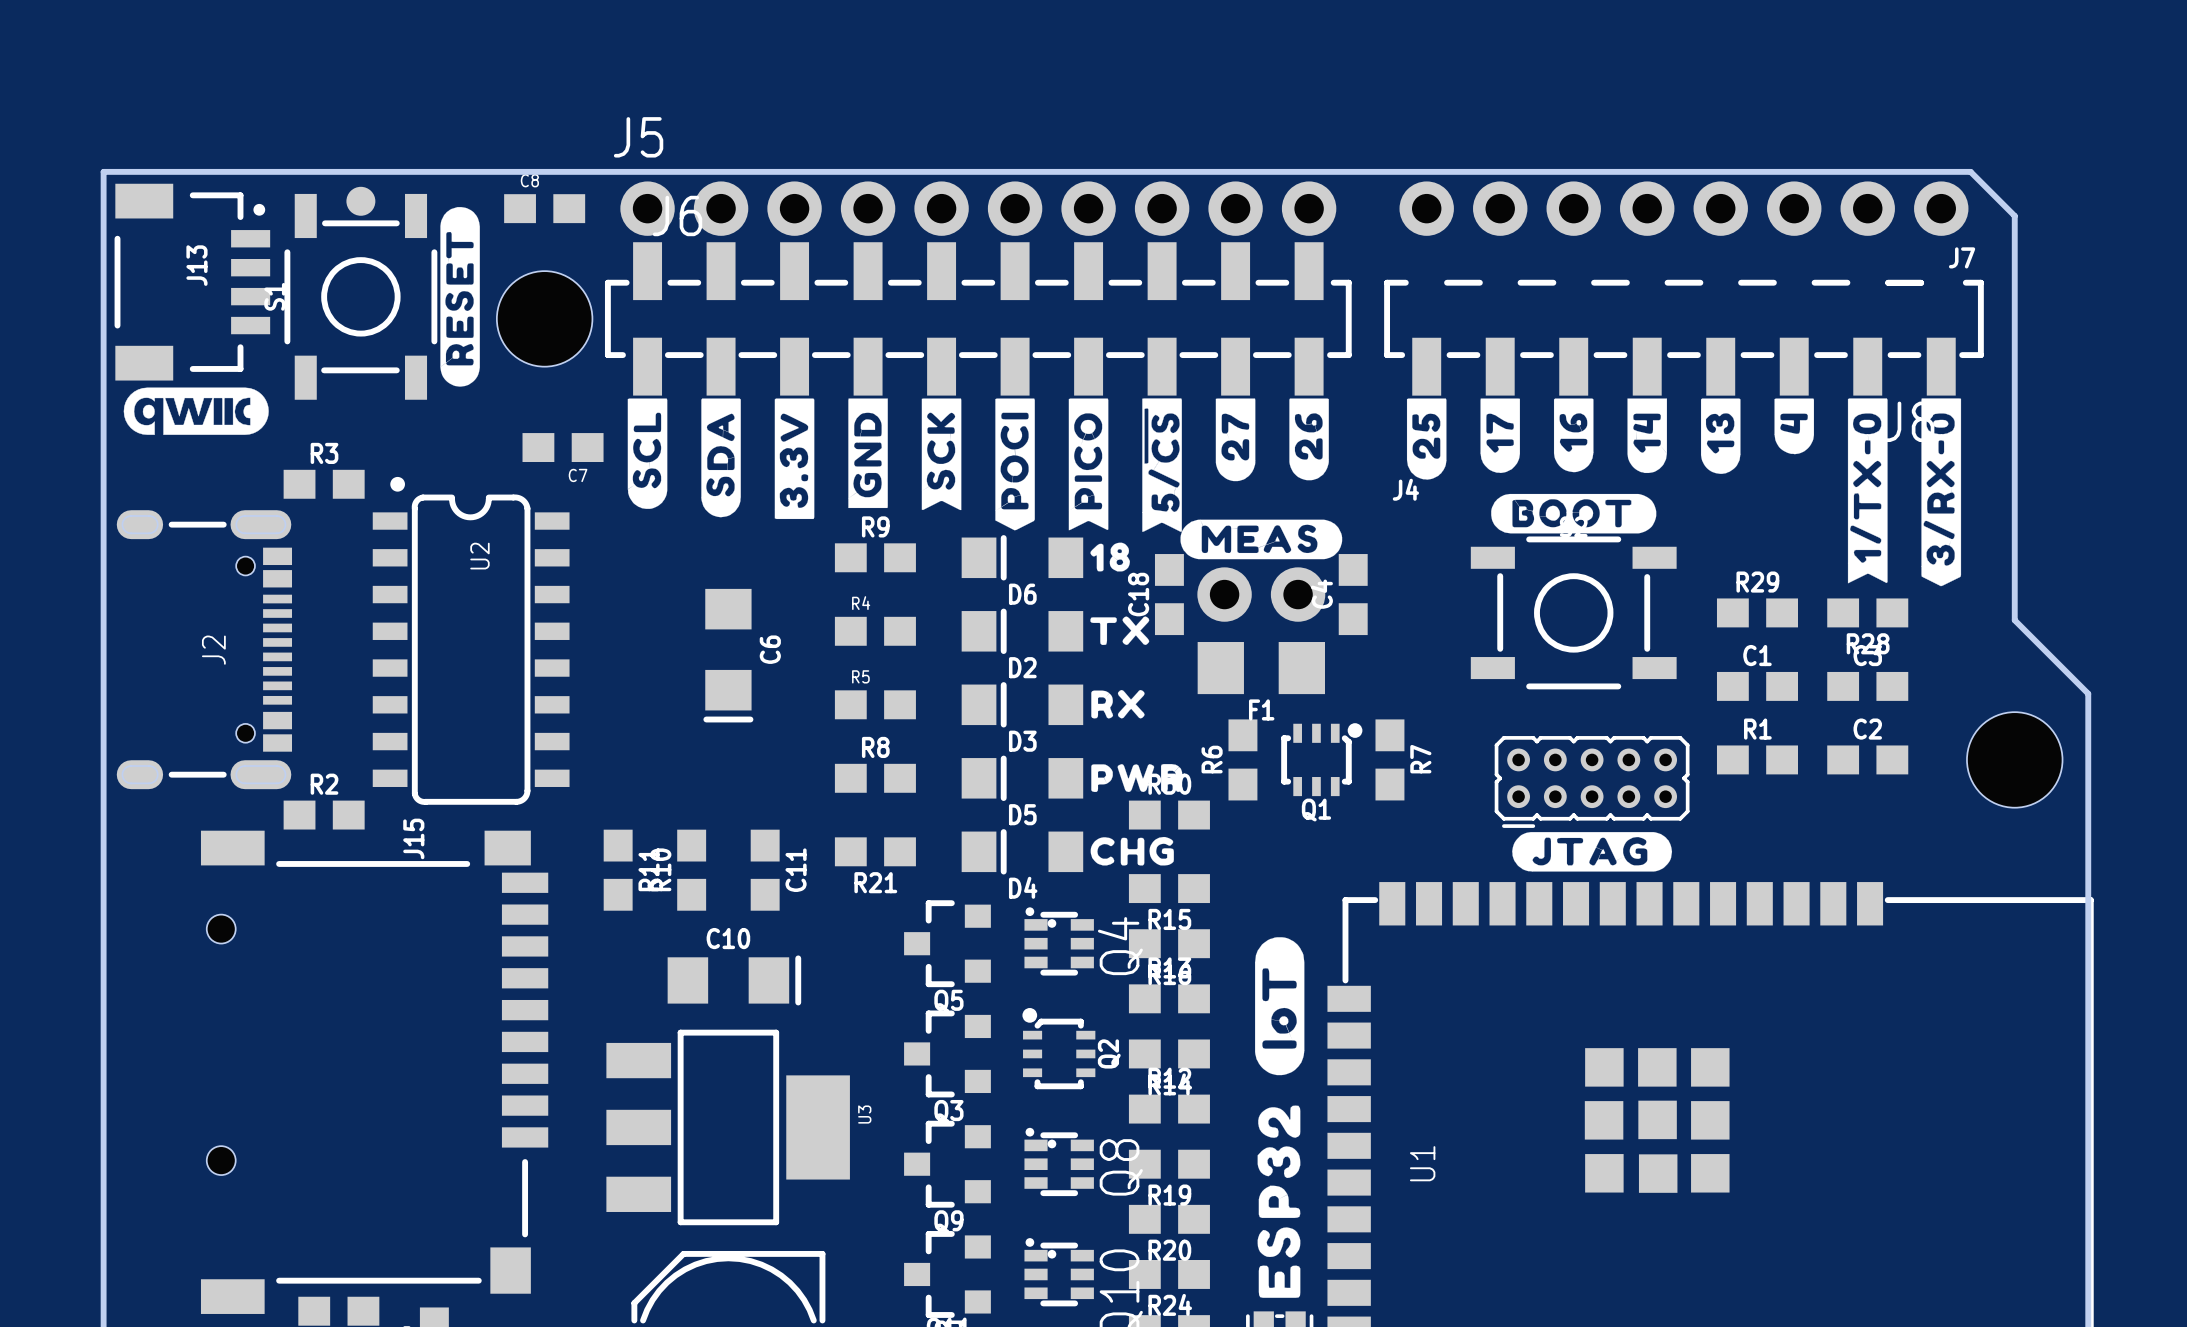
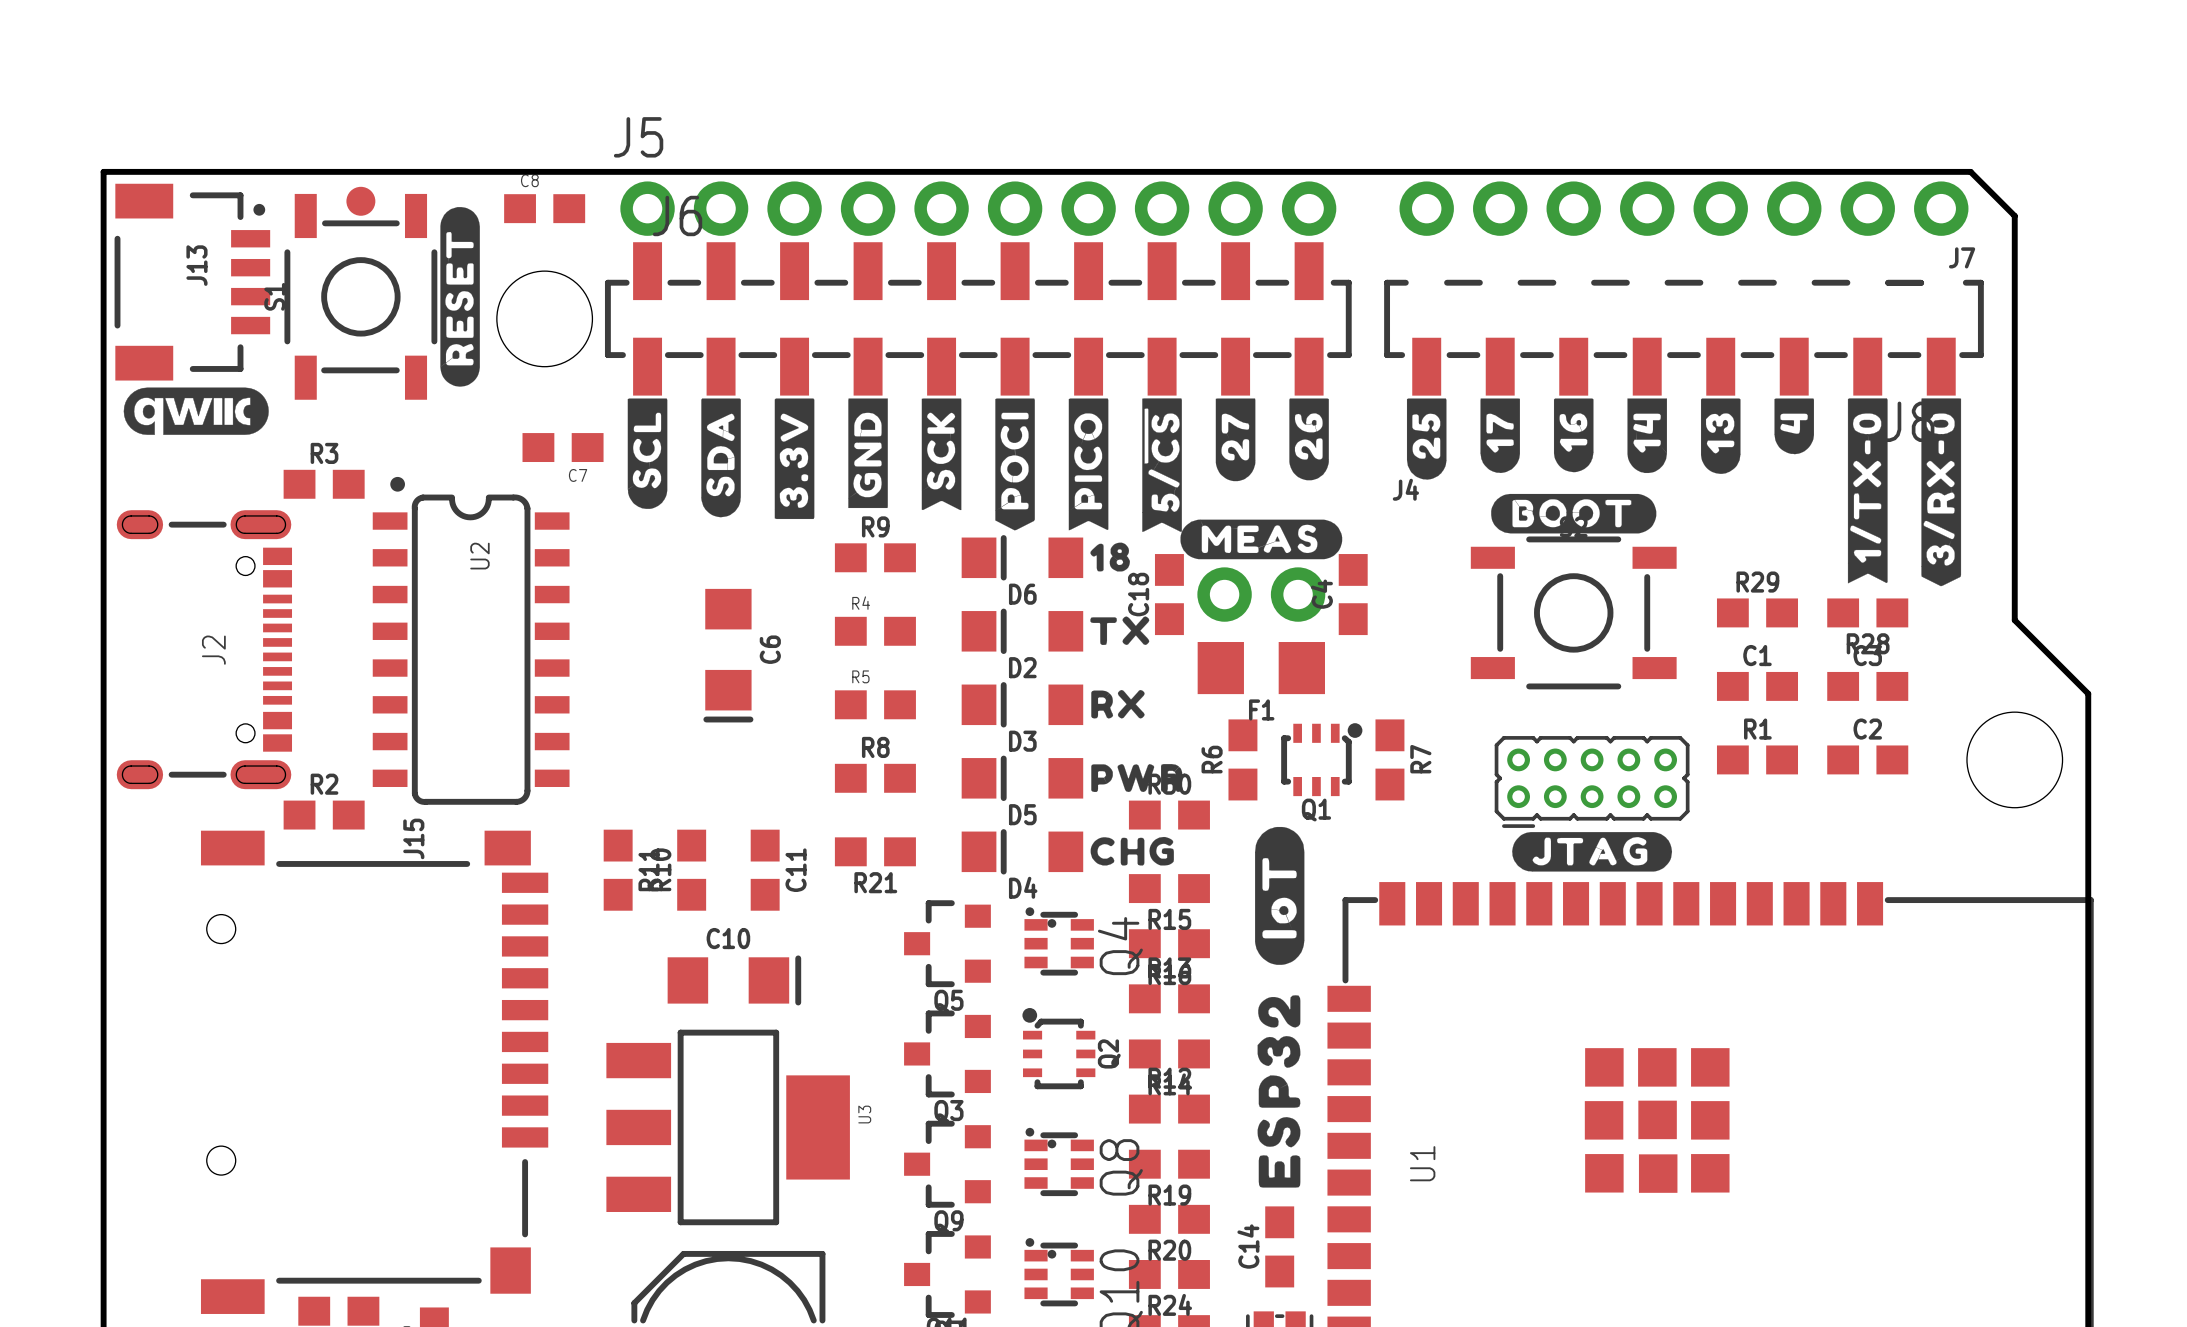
drawing position: (1279, 1006) -> (1279, 895)
drawing position: (1278, 1201) -> (1278, 1091)
C14: none -> (1279, 1246)

